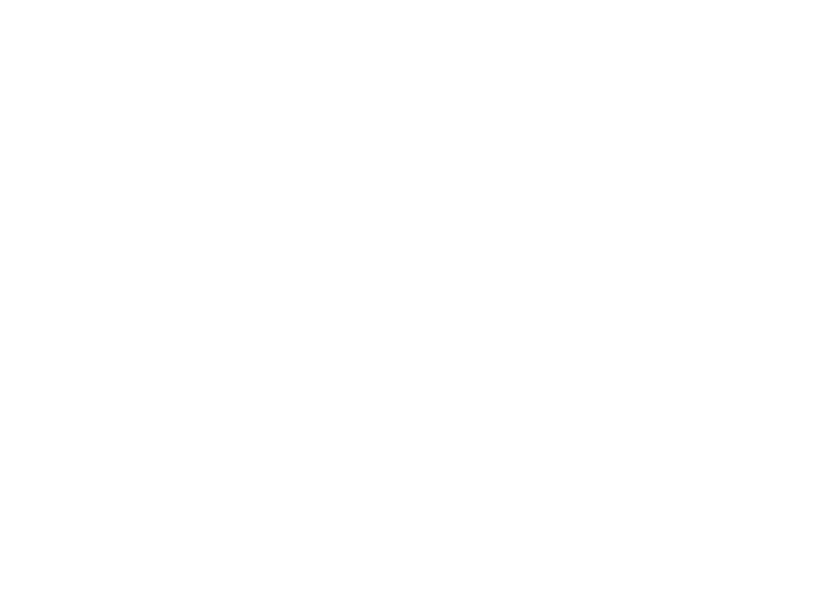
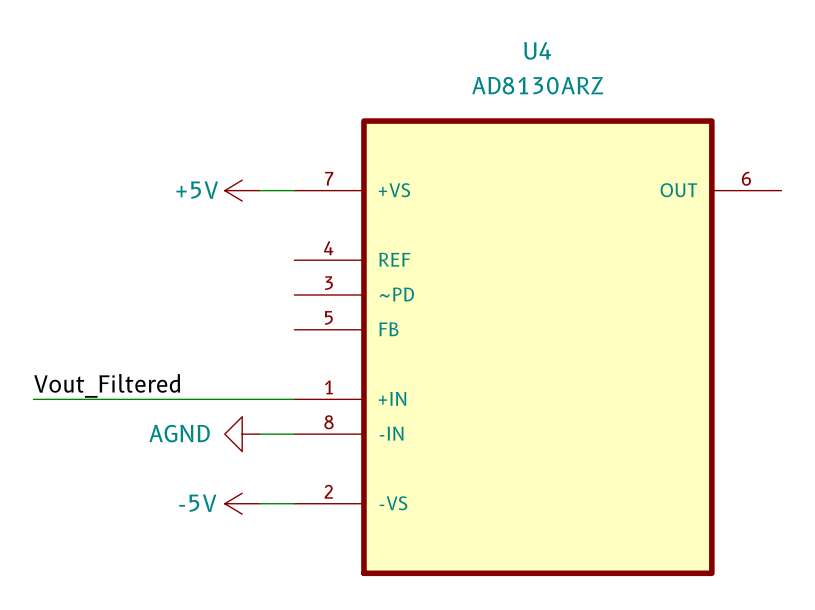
power symbol: none -> +5V (242, 190)
wire: none -> (259, 190) (294, 190)
U4: none -> AD8130ARZ (537, 347)
label: none -> Vout_Filtered (107, 385)
wire: none -> (33, 399) (294, 399)
power symbol: none -> AGND (242, 434)
wire: none -> (259, 434) (294, 434)
power symbol: none -> -5V (242, 503)
wire: none -> (259, 503) (294, 503)

